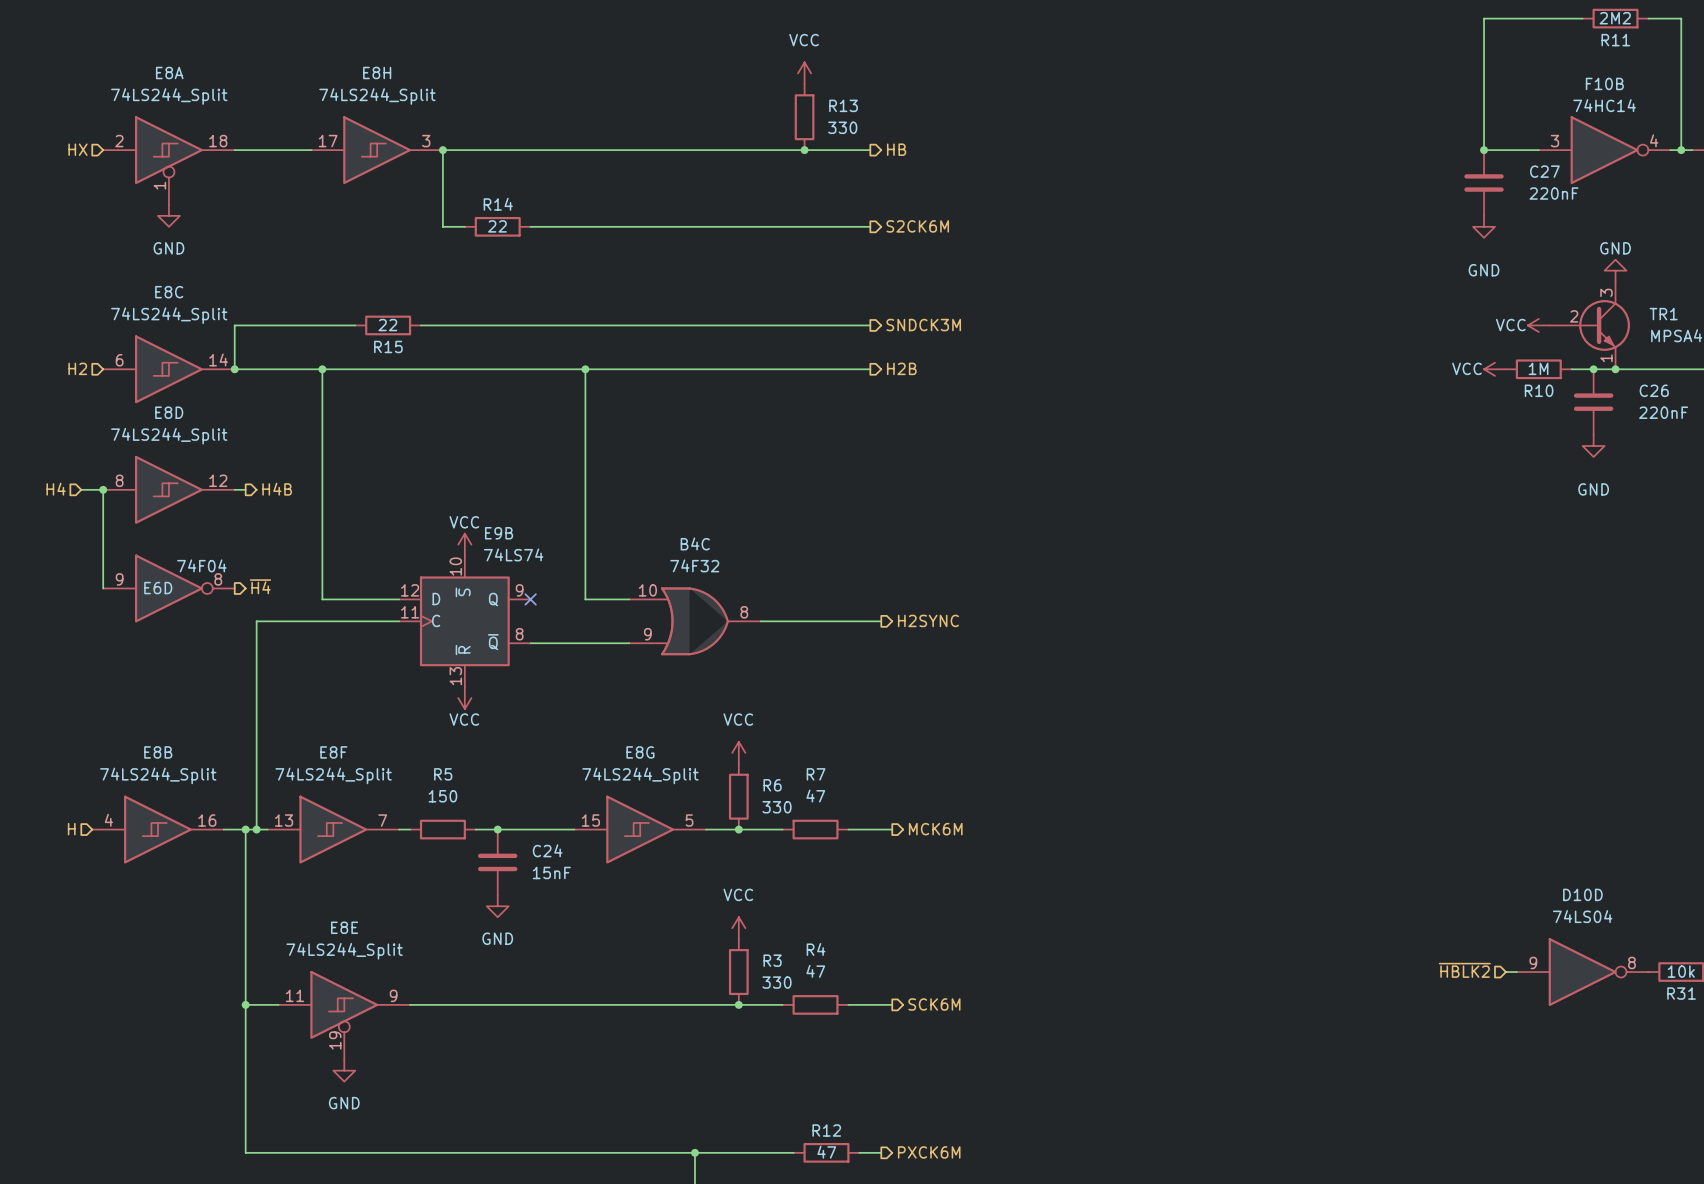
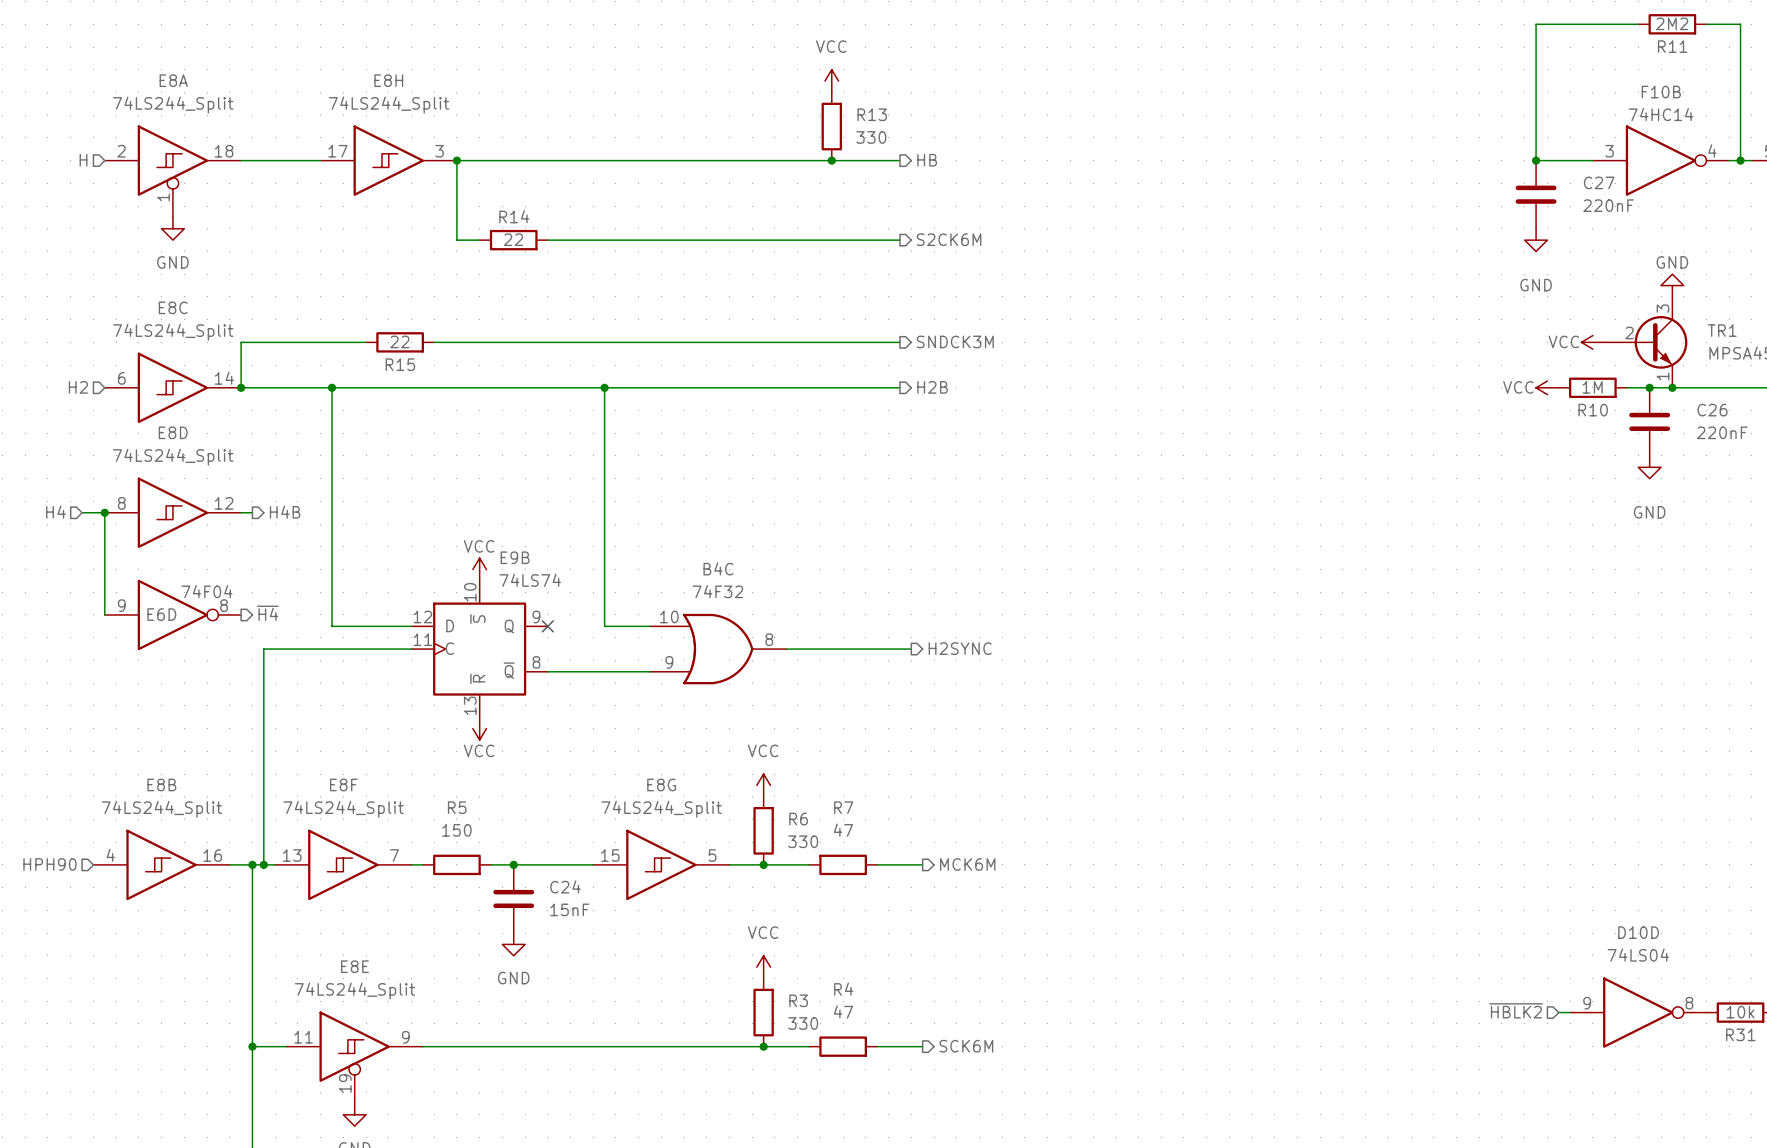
hierarchical label: HX (77, 149) -> H (83, 160)
hierarchical label: H (71, 829) -> HPH90 (49, 864)

